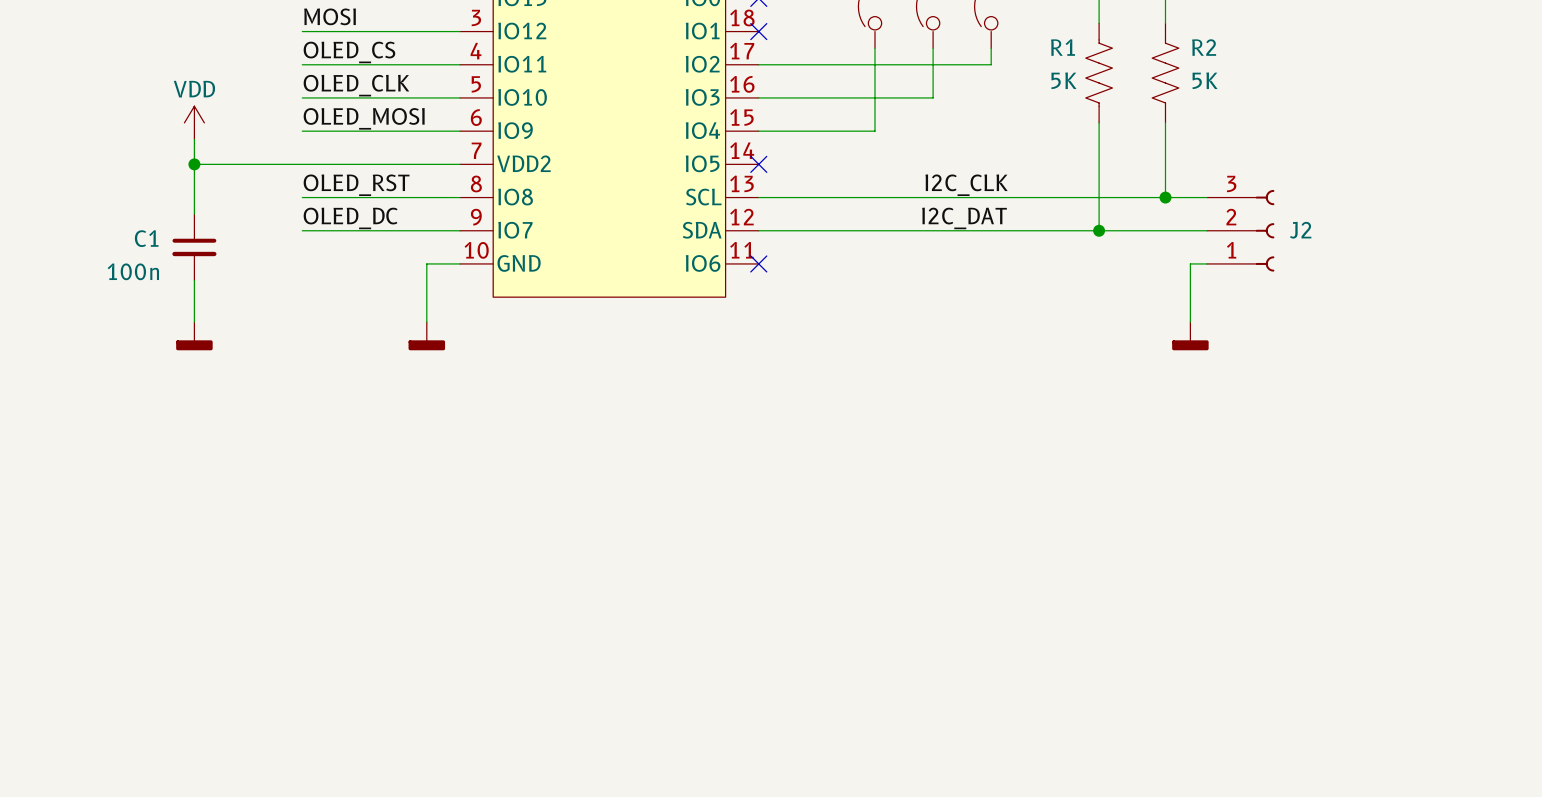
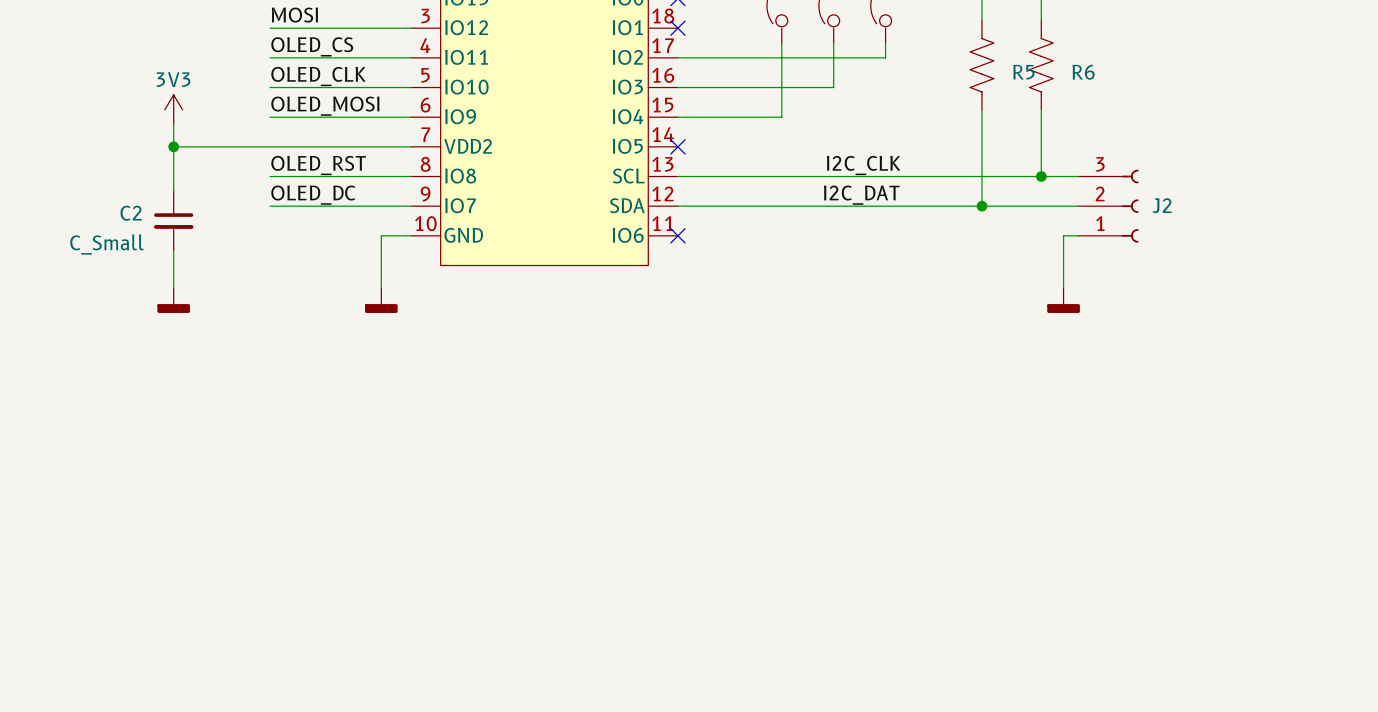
R1 name: R1 (1062, 47) -> R5 (1023, 72)
R2 name: R2 (1204, 47) -> R6 (1083, 72)
R1 value: 5K (1063, 80) -> none
R2 value: 5K (1205, 80) -> none
power symbol: VDD (194, 122) -> 3V3 (173, 109)
C1 name: C1 (146, 238) -> C2 (131, 213)
C1 value: 100n (133, 271) -> C_Small (107, 244)

